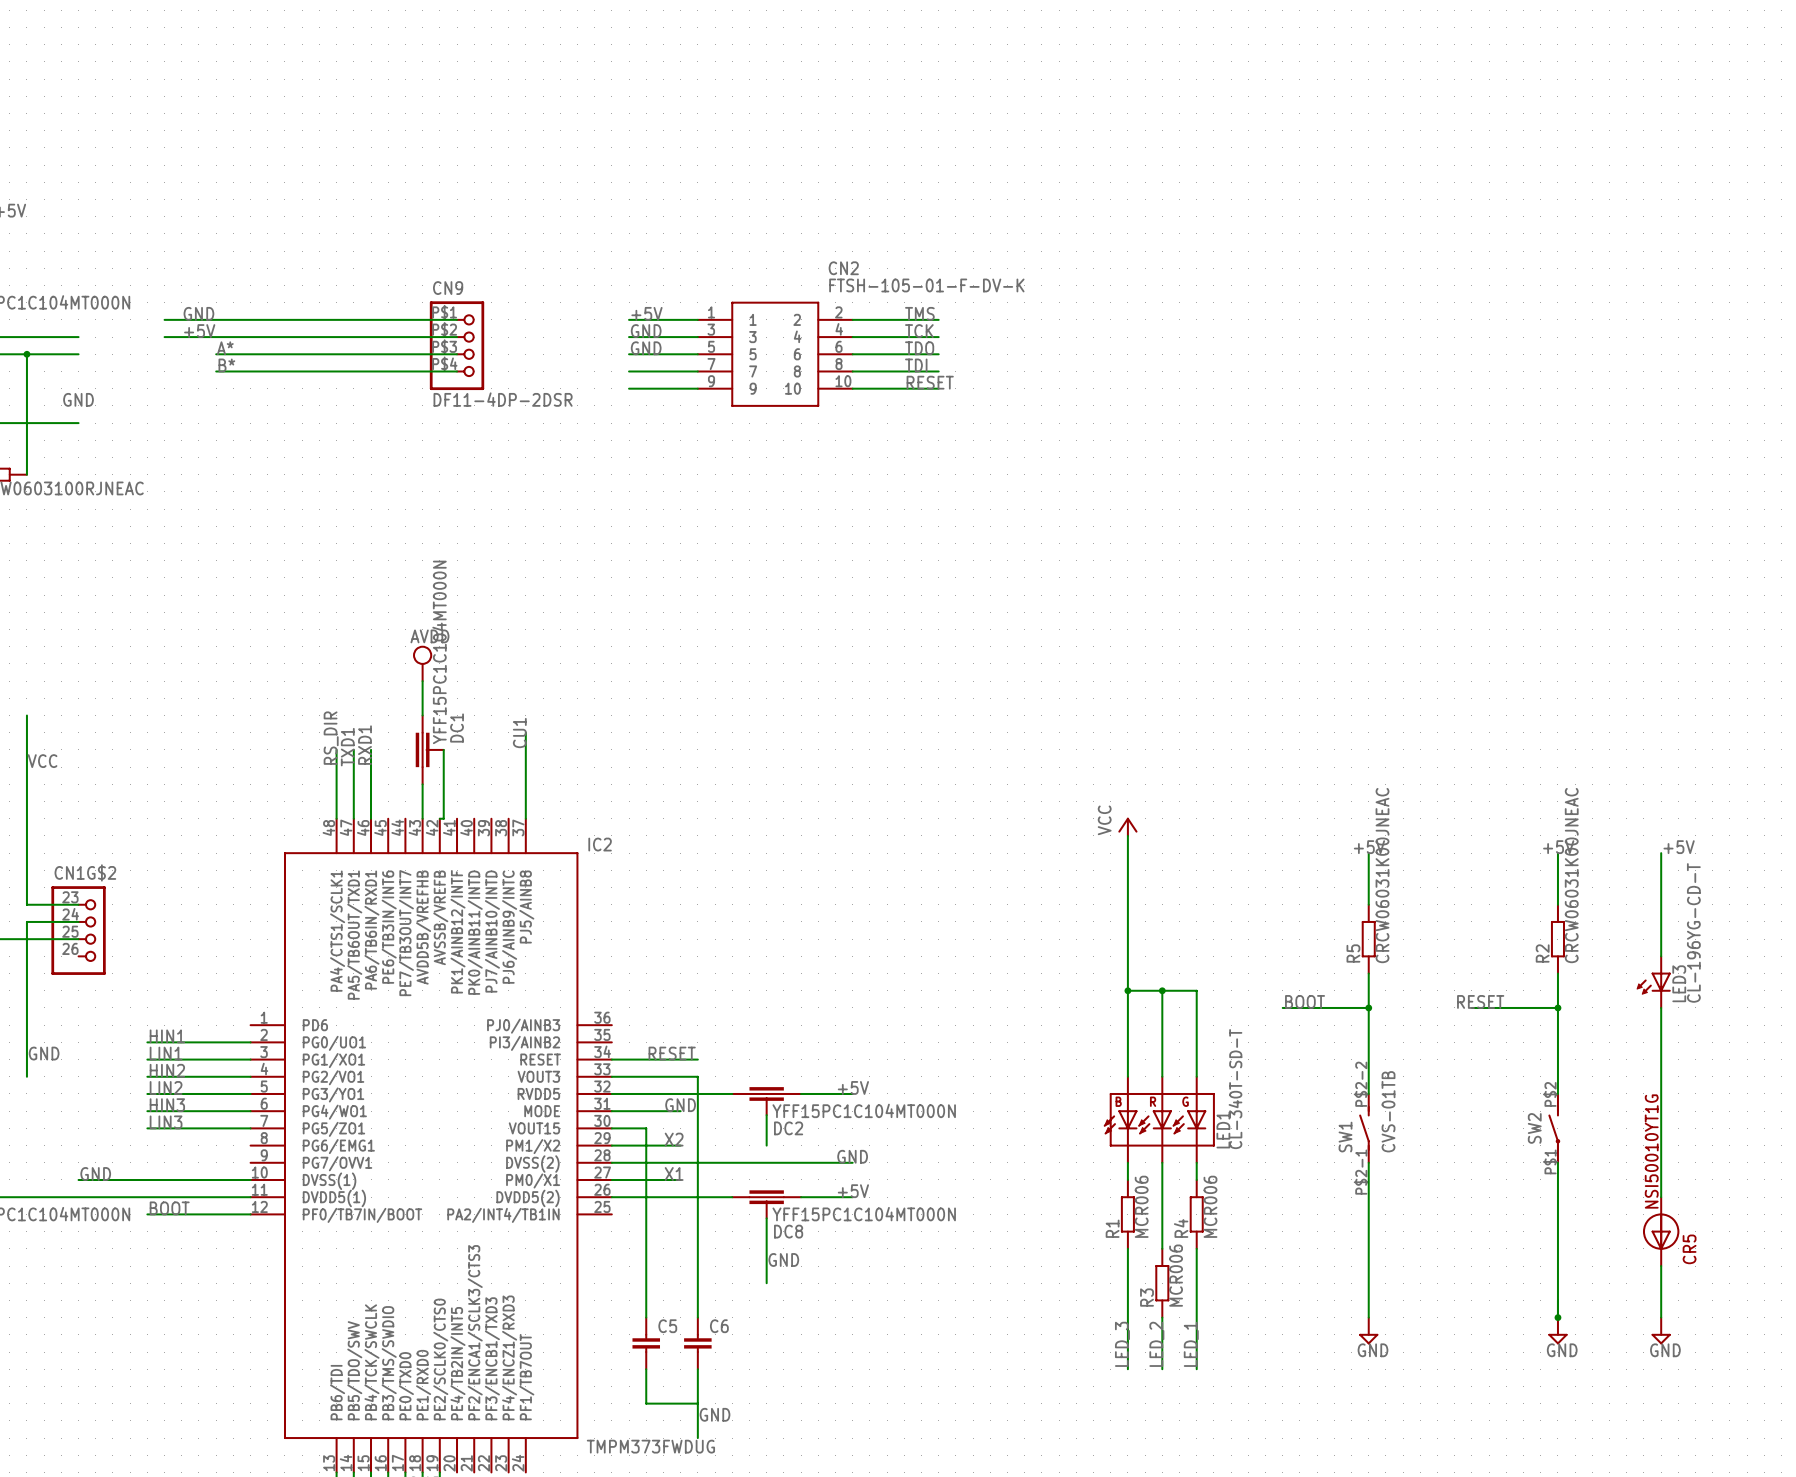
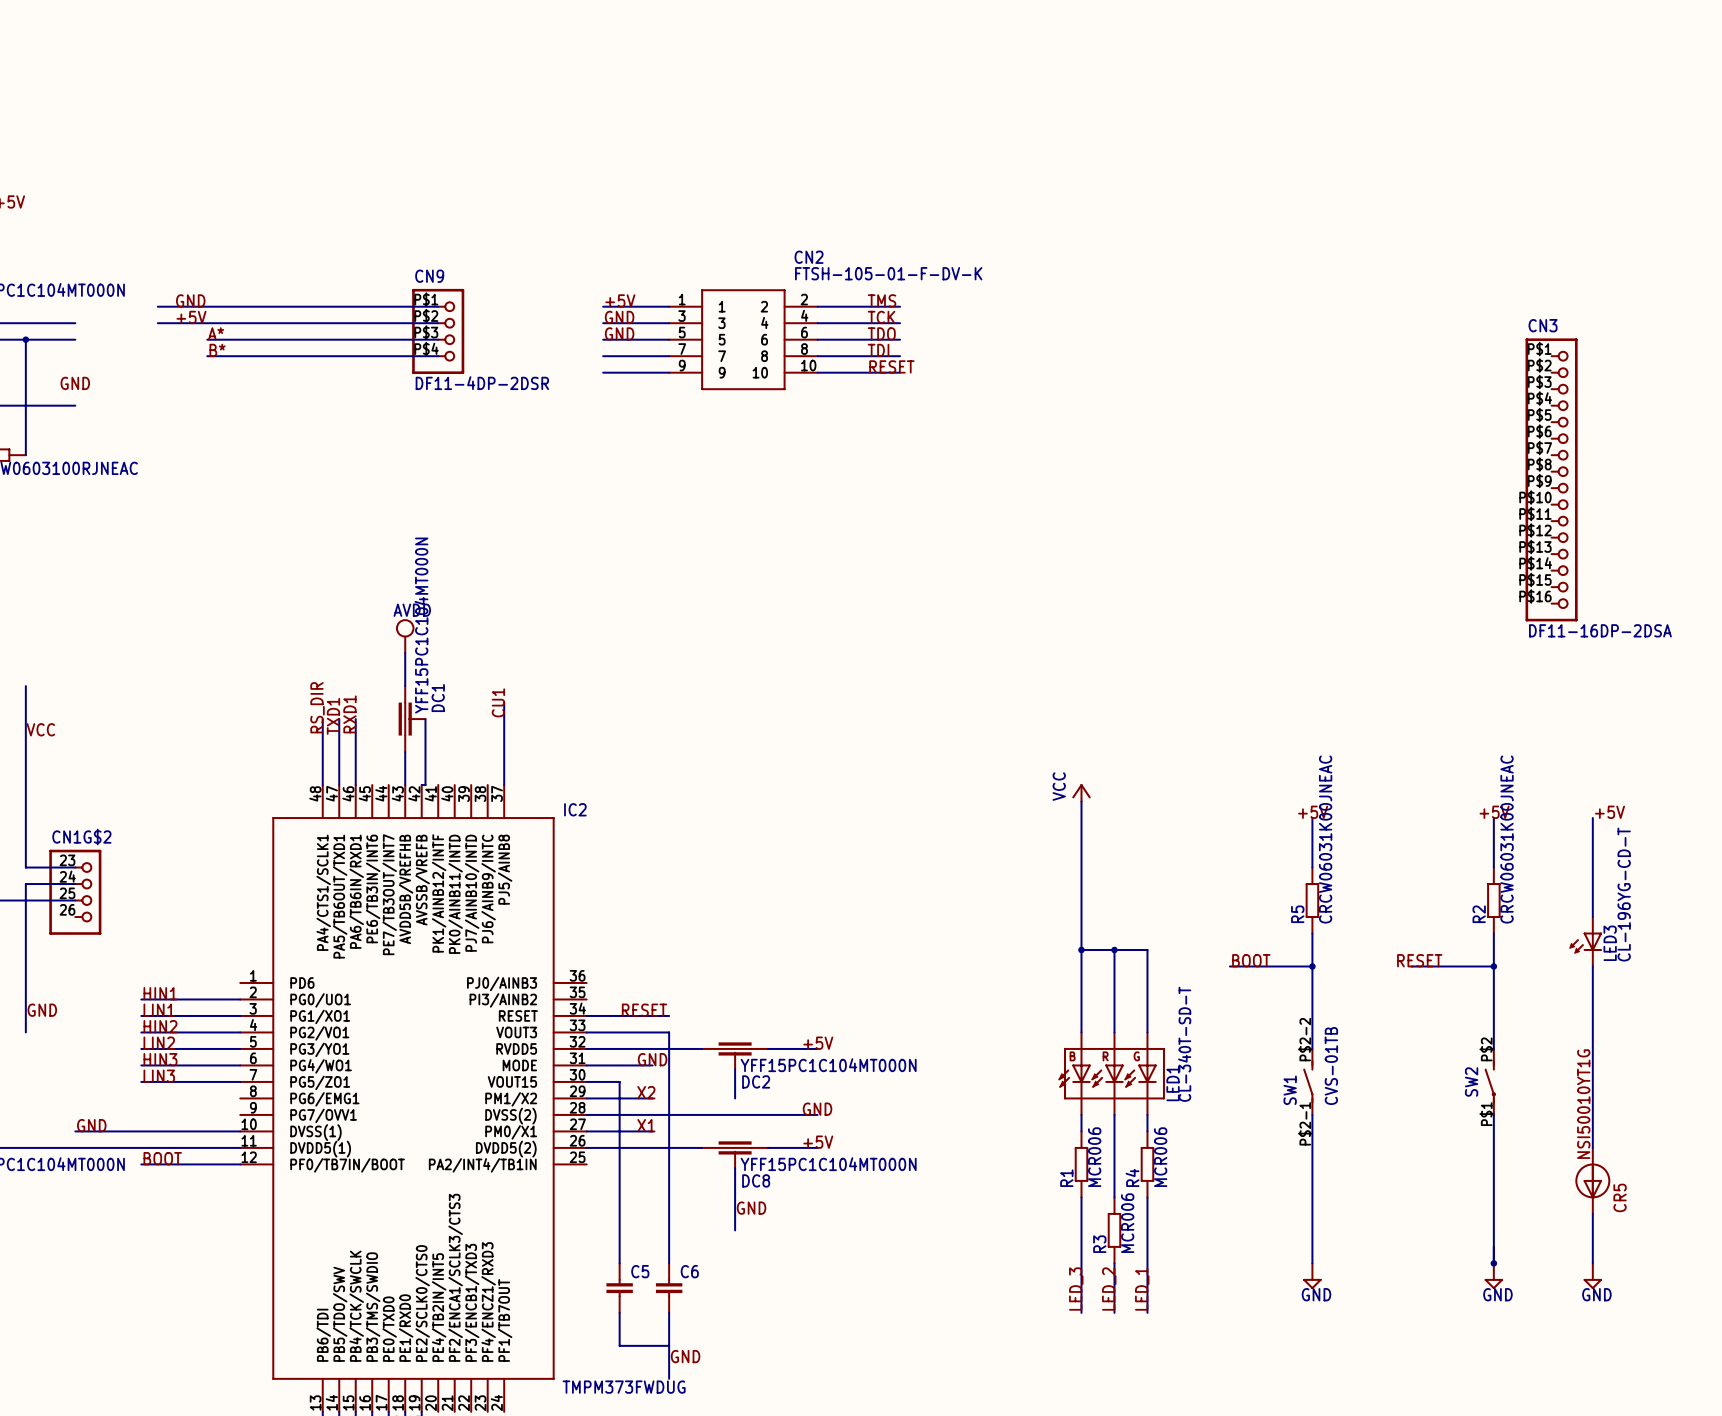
CN3: none -> DF11-16DP-2DSA (1551, 479)

